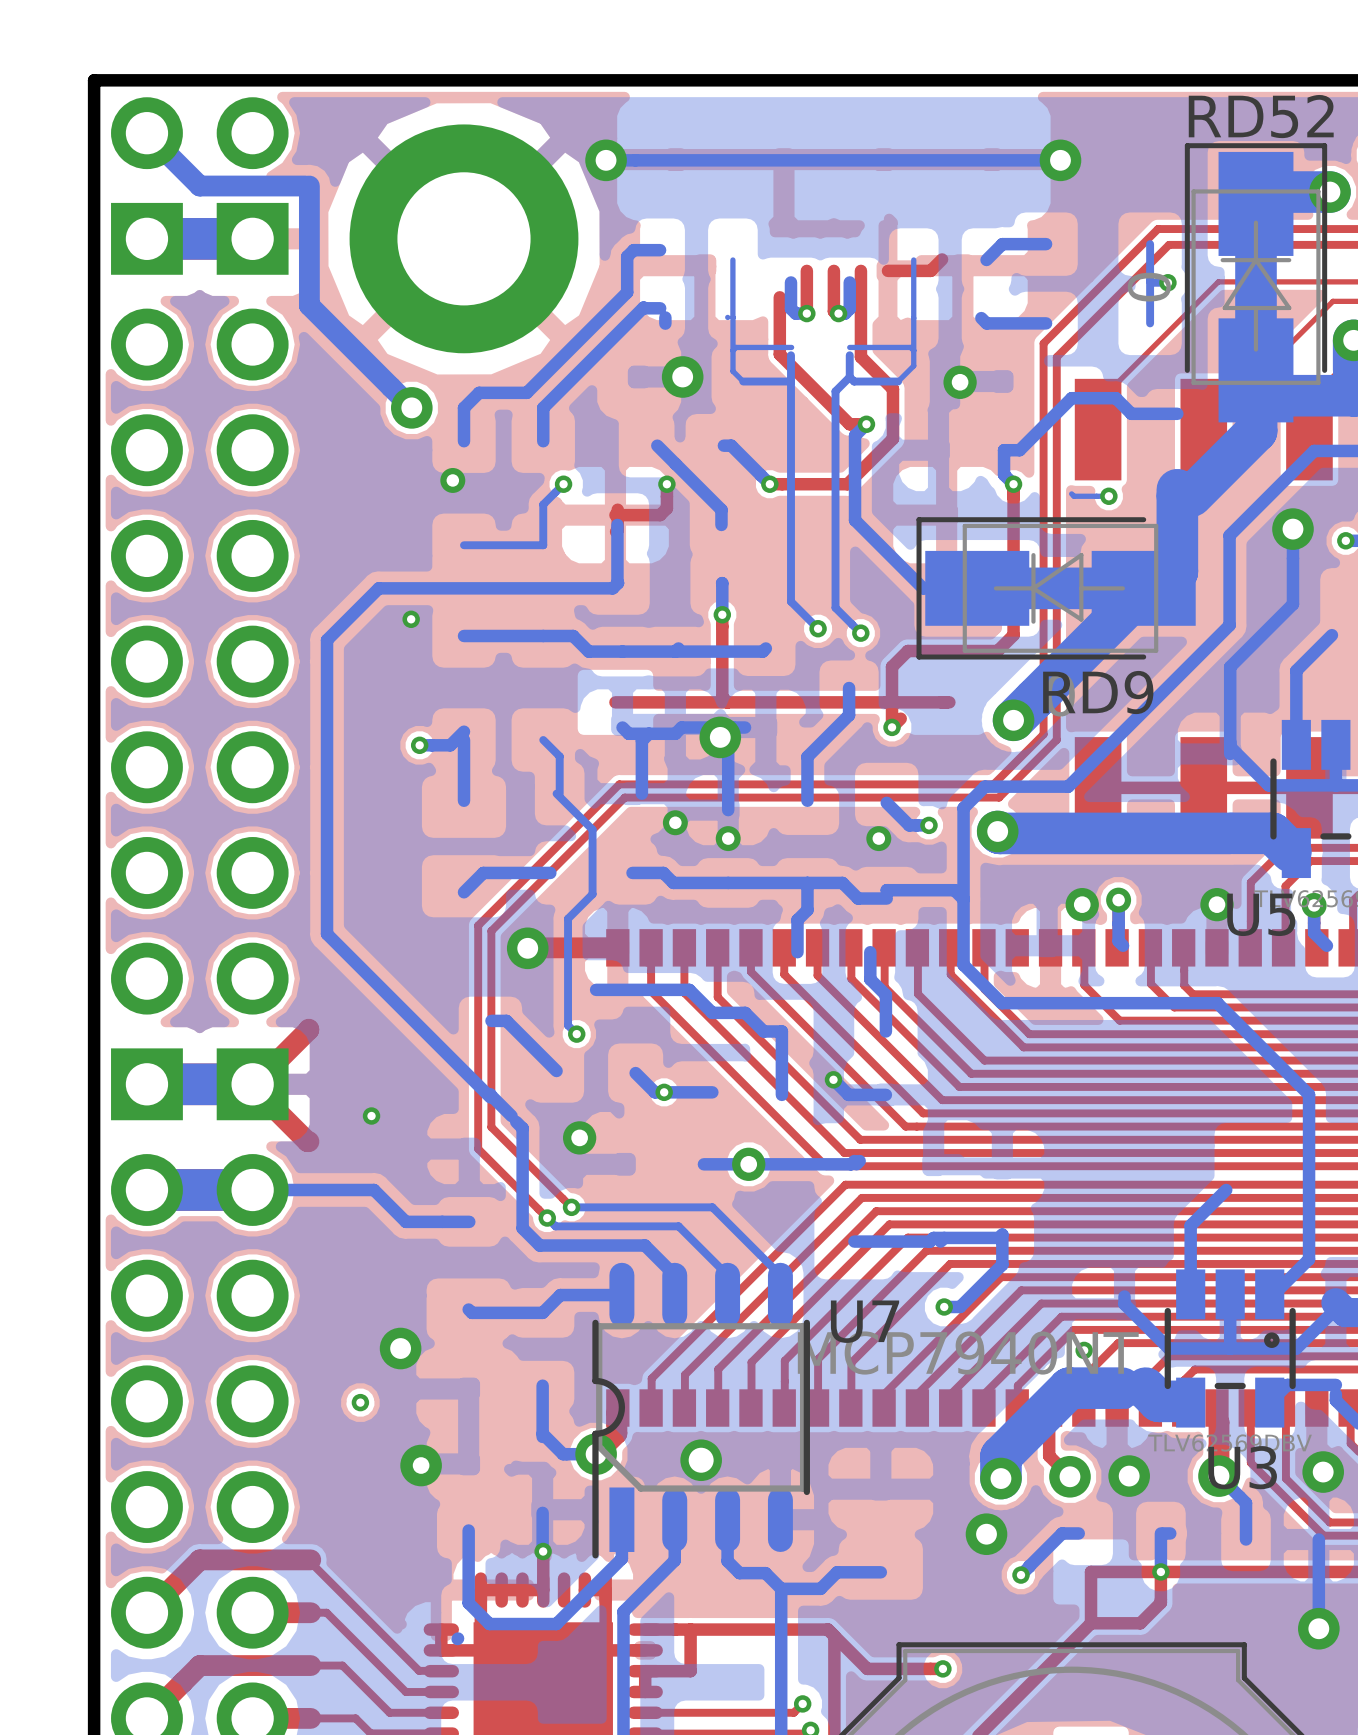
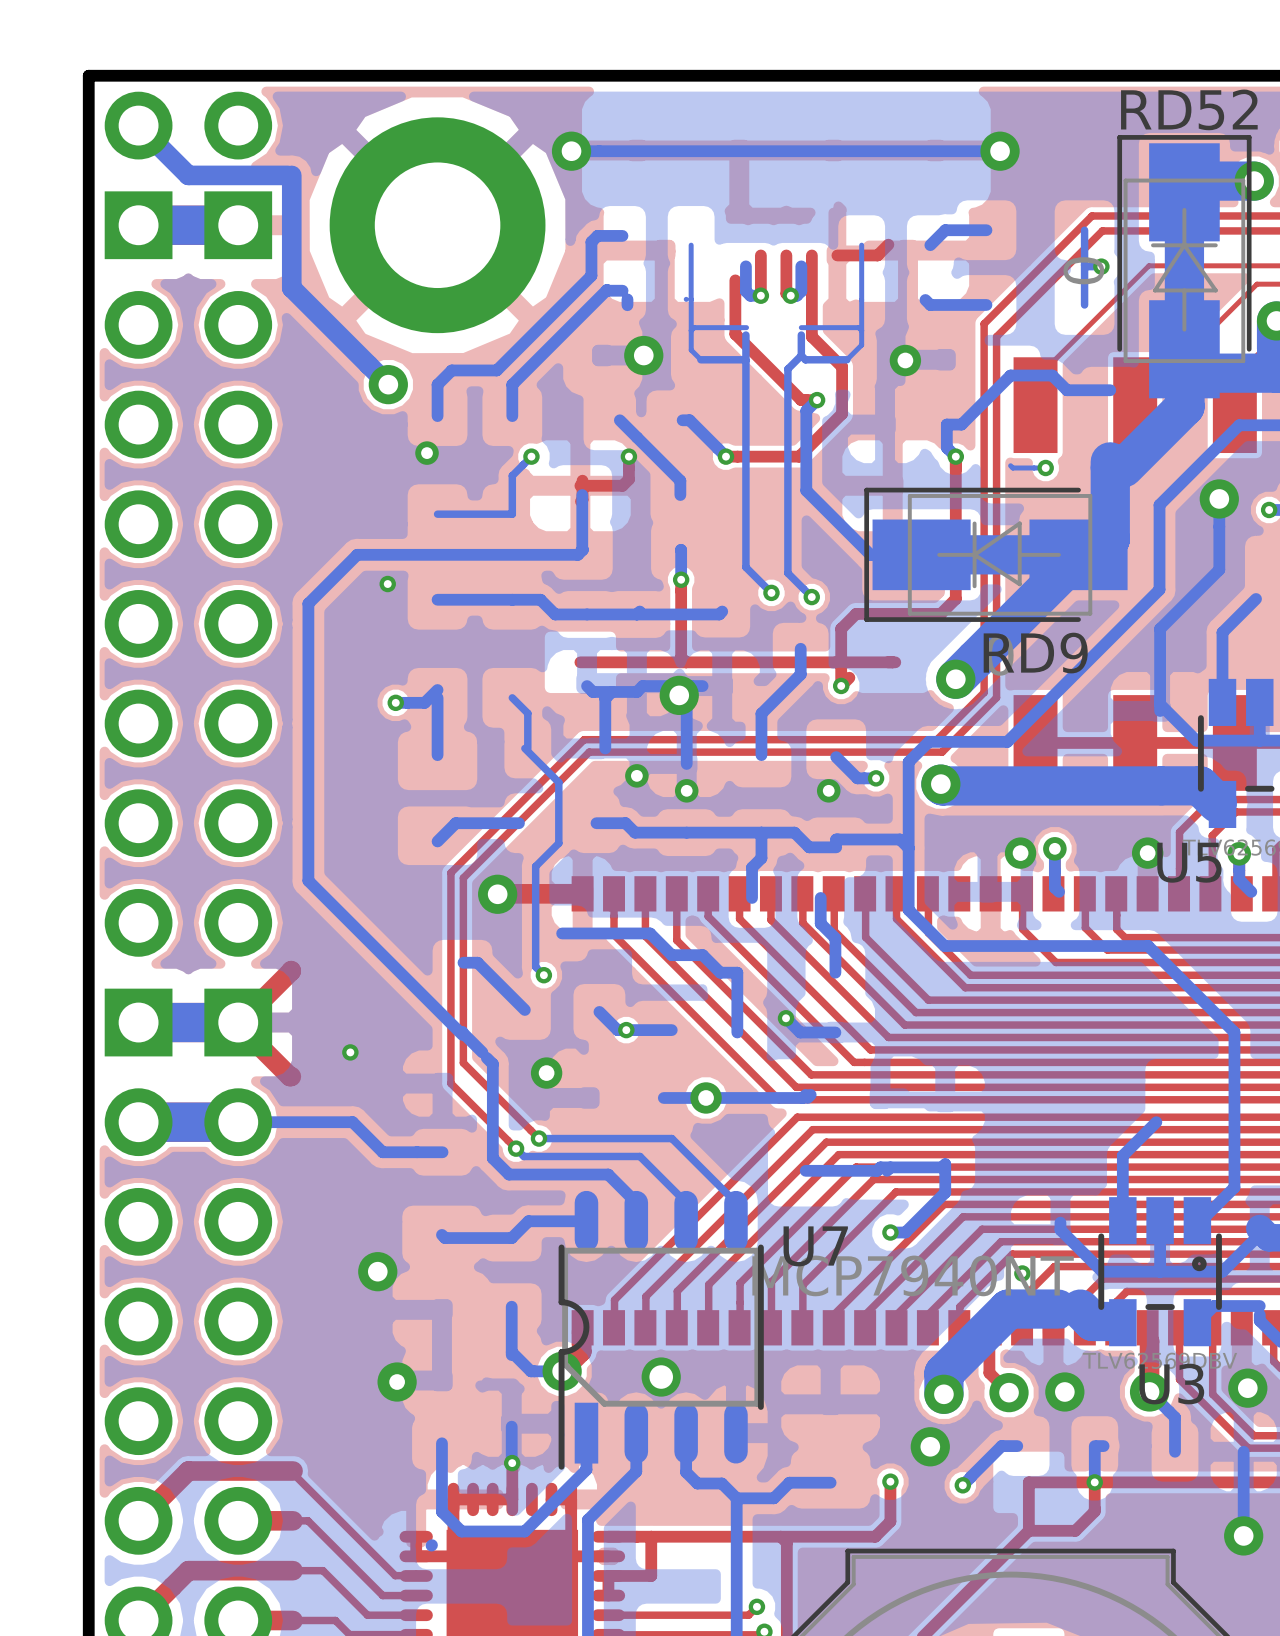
via: (360, 1402) -> none
top track: none -> (890, 1481) (890, 1521) (875, 1536) (780, 1536)
top track: (834, 1635) (867, 1668) (942, 1668) -> none
via position: (942, 1668) -> (890, 1481)

